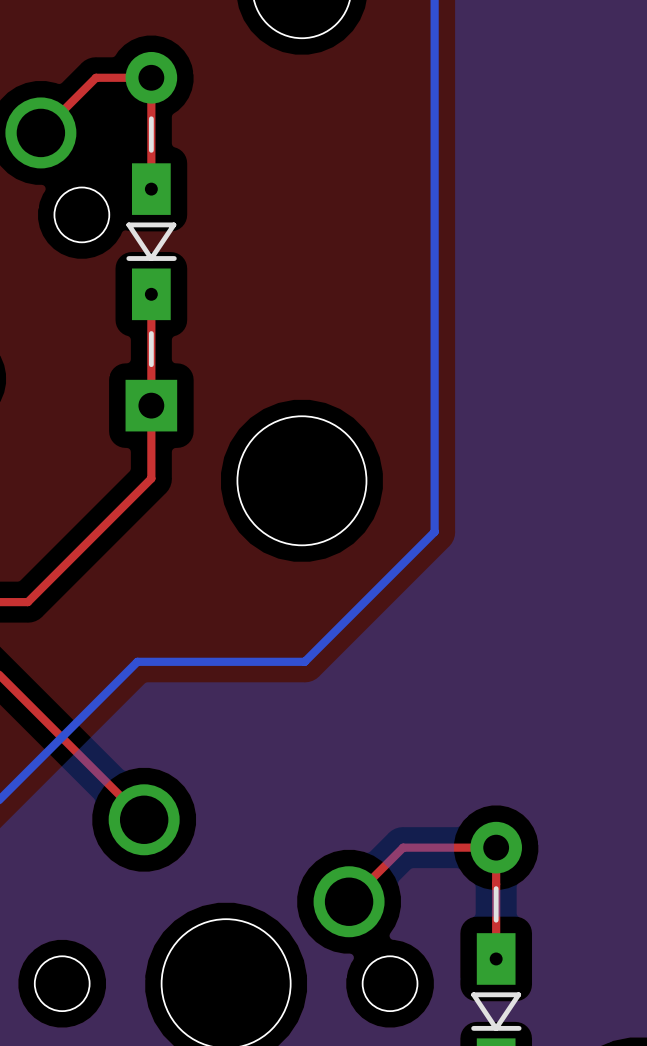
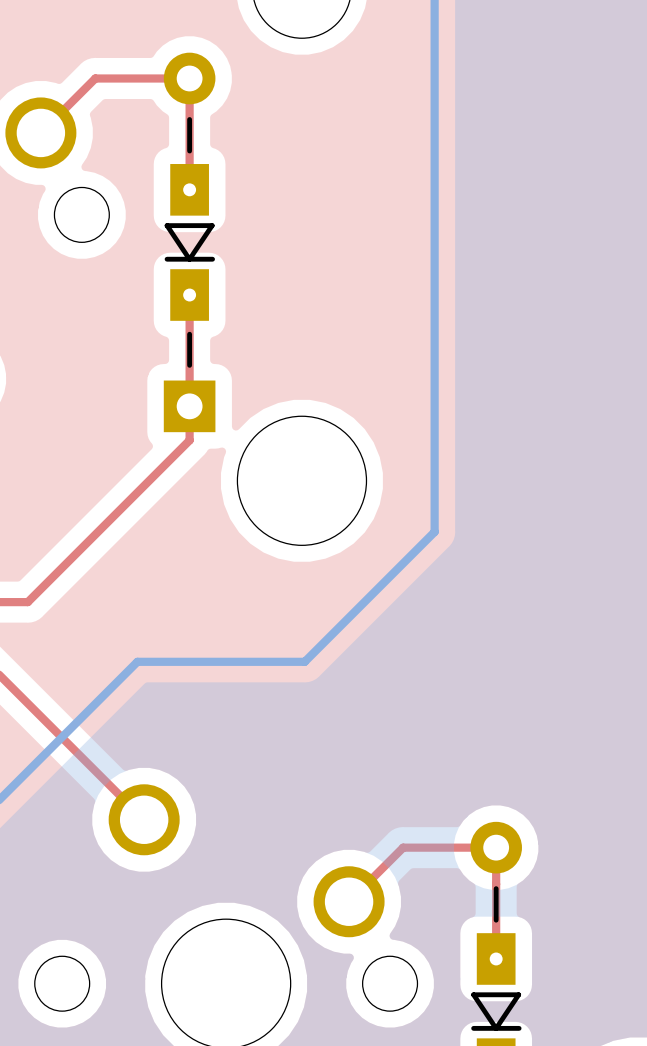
top track: (95, 78) (151, 77) (151, 189) -> (95, 78) (189, 78) (189, 189)
part position: (151, 241) -> (189, 242)
top track: (151, 294) (151, 478) -> (189, 295) (189, 440) (151, 478)

